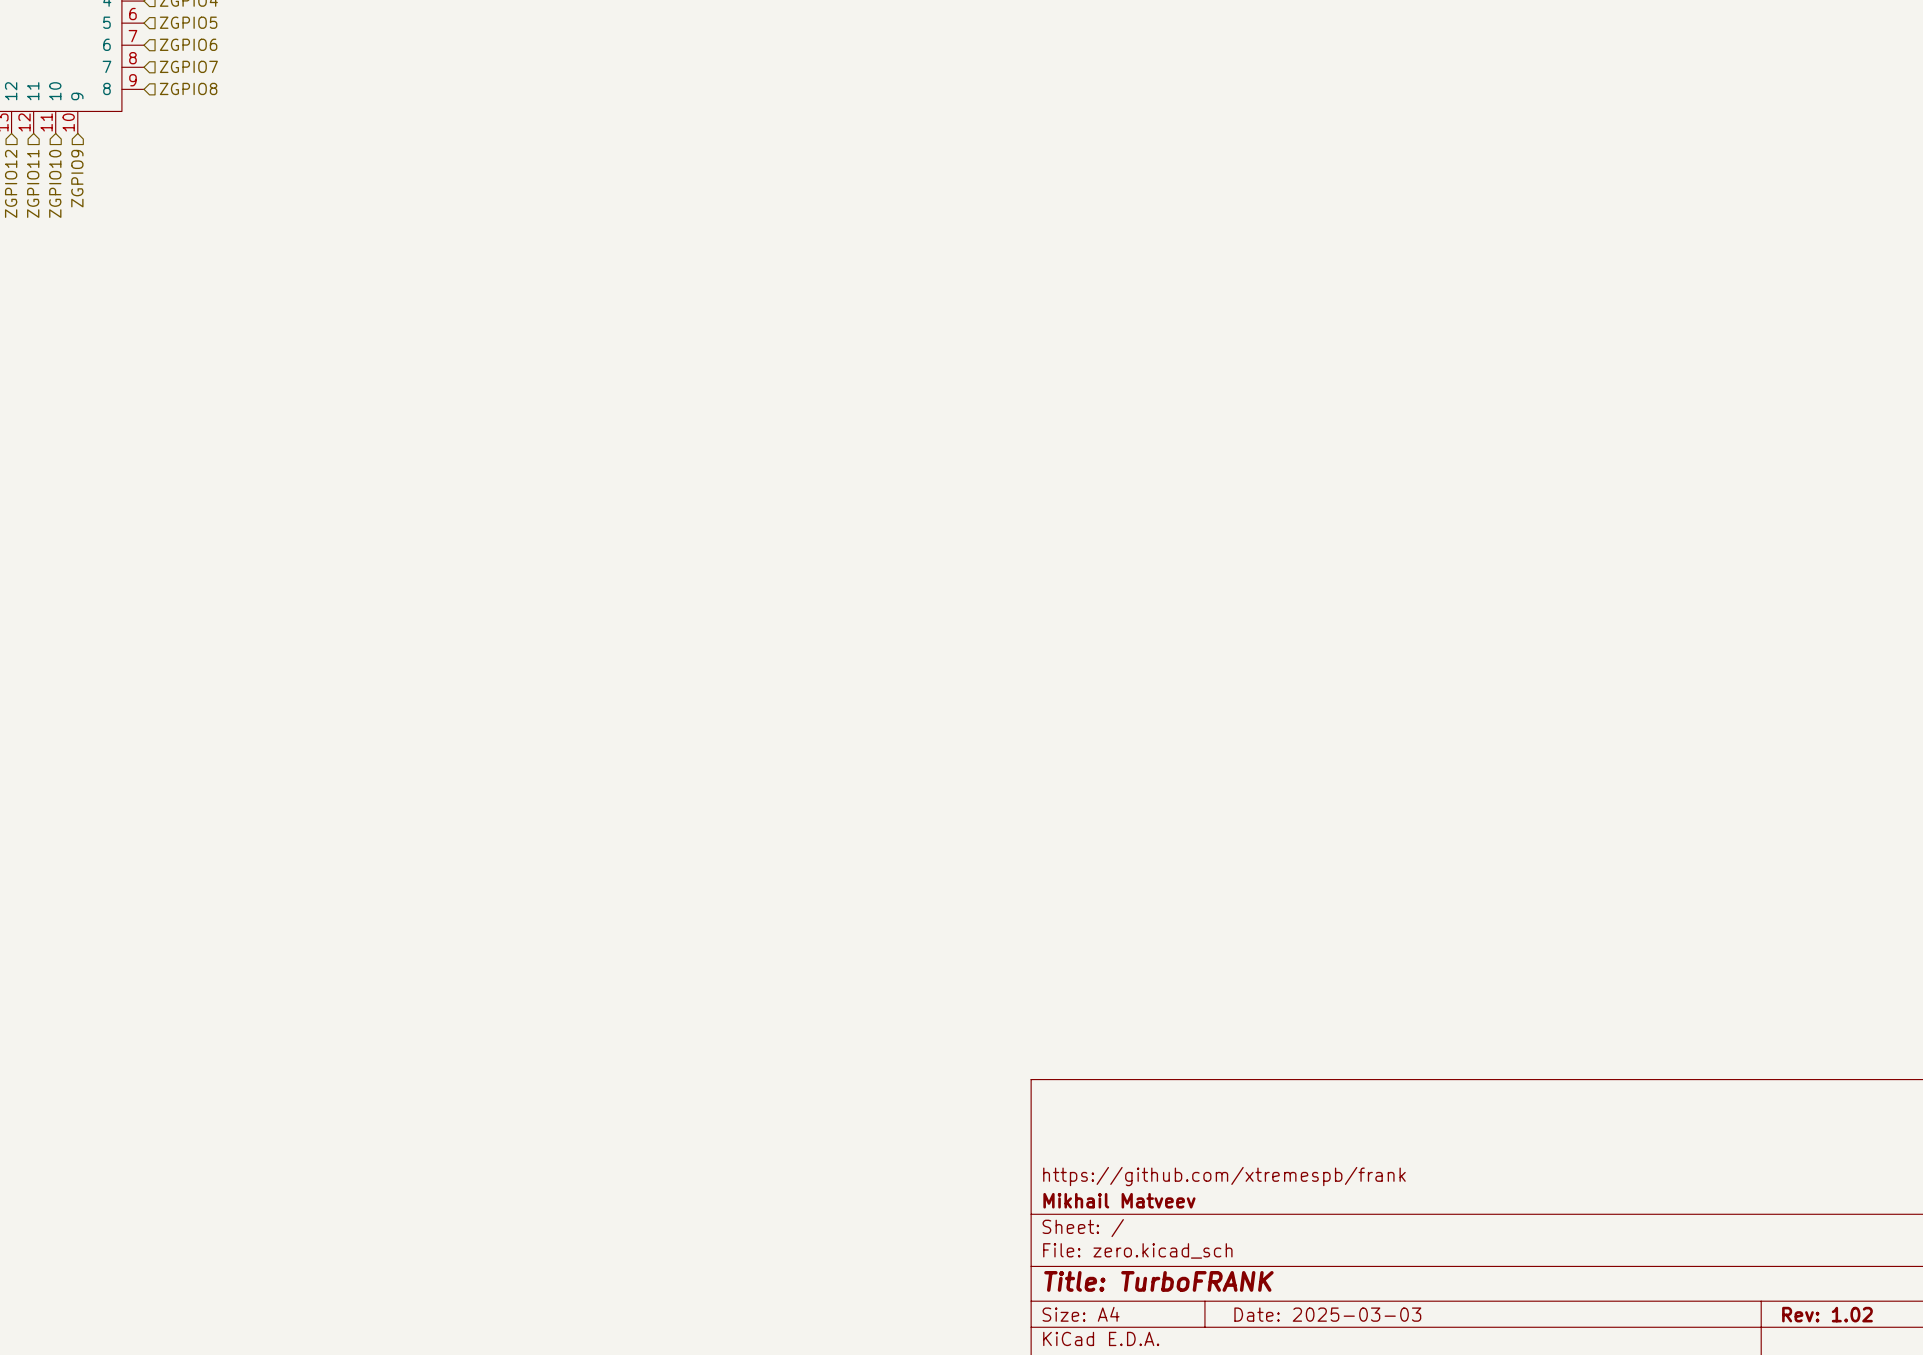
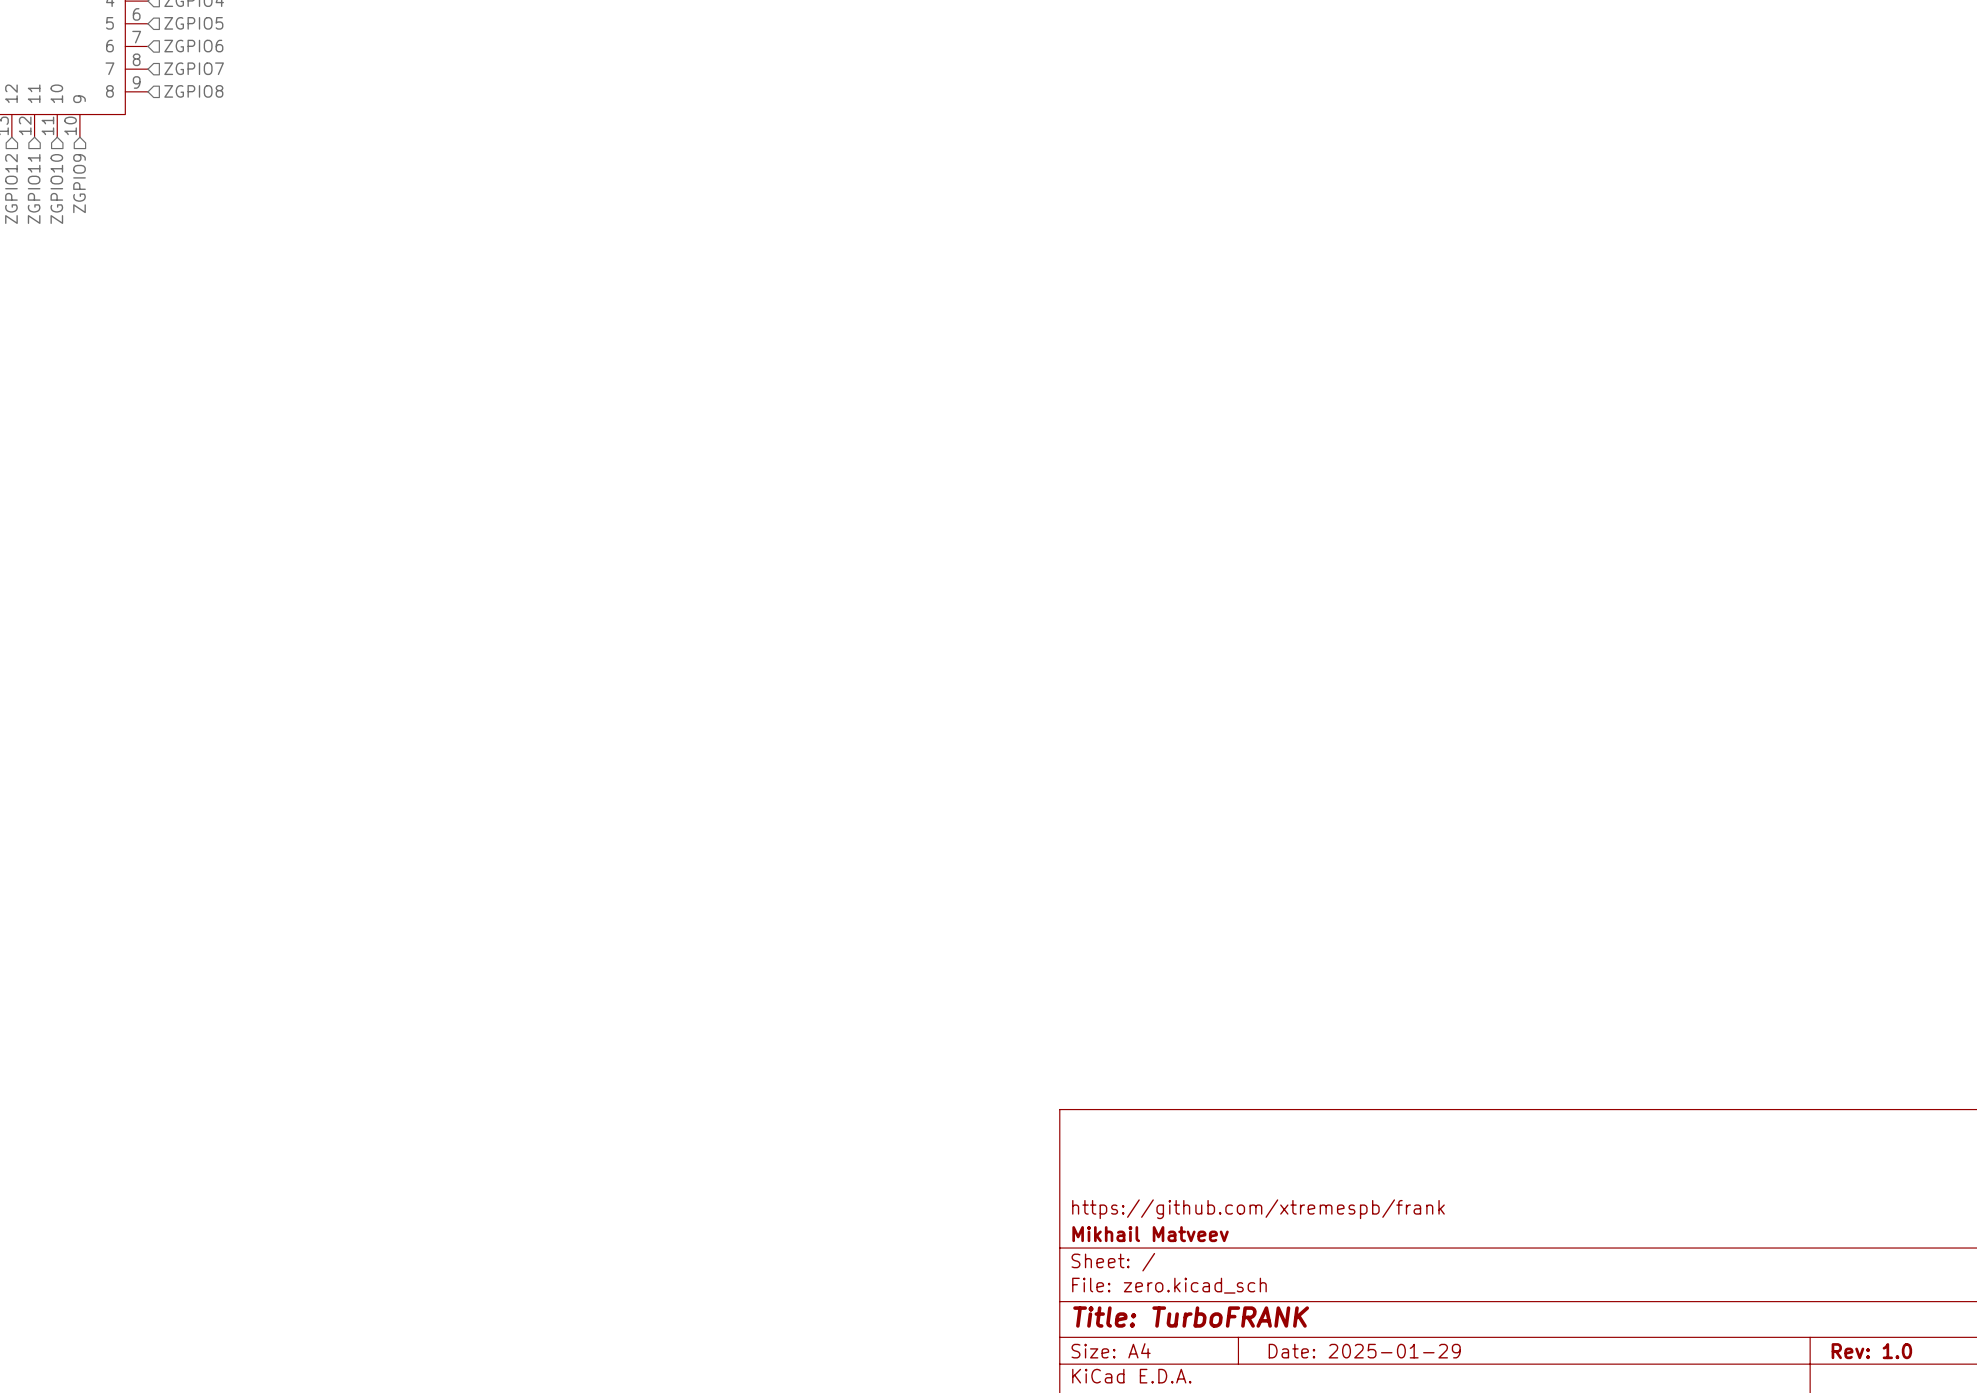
title block: Date: 2025-03-03 (1327, 1314) -> Date: 2025-01-29 (1364, 1351)
title block: Rev: 1.02 (1827, 1314) -> Rev: 1.0 (1871, 1351)

